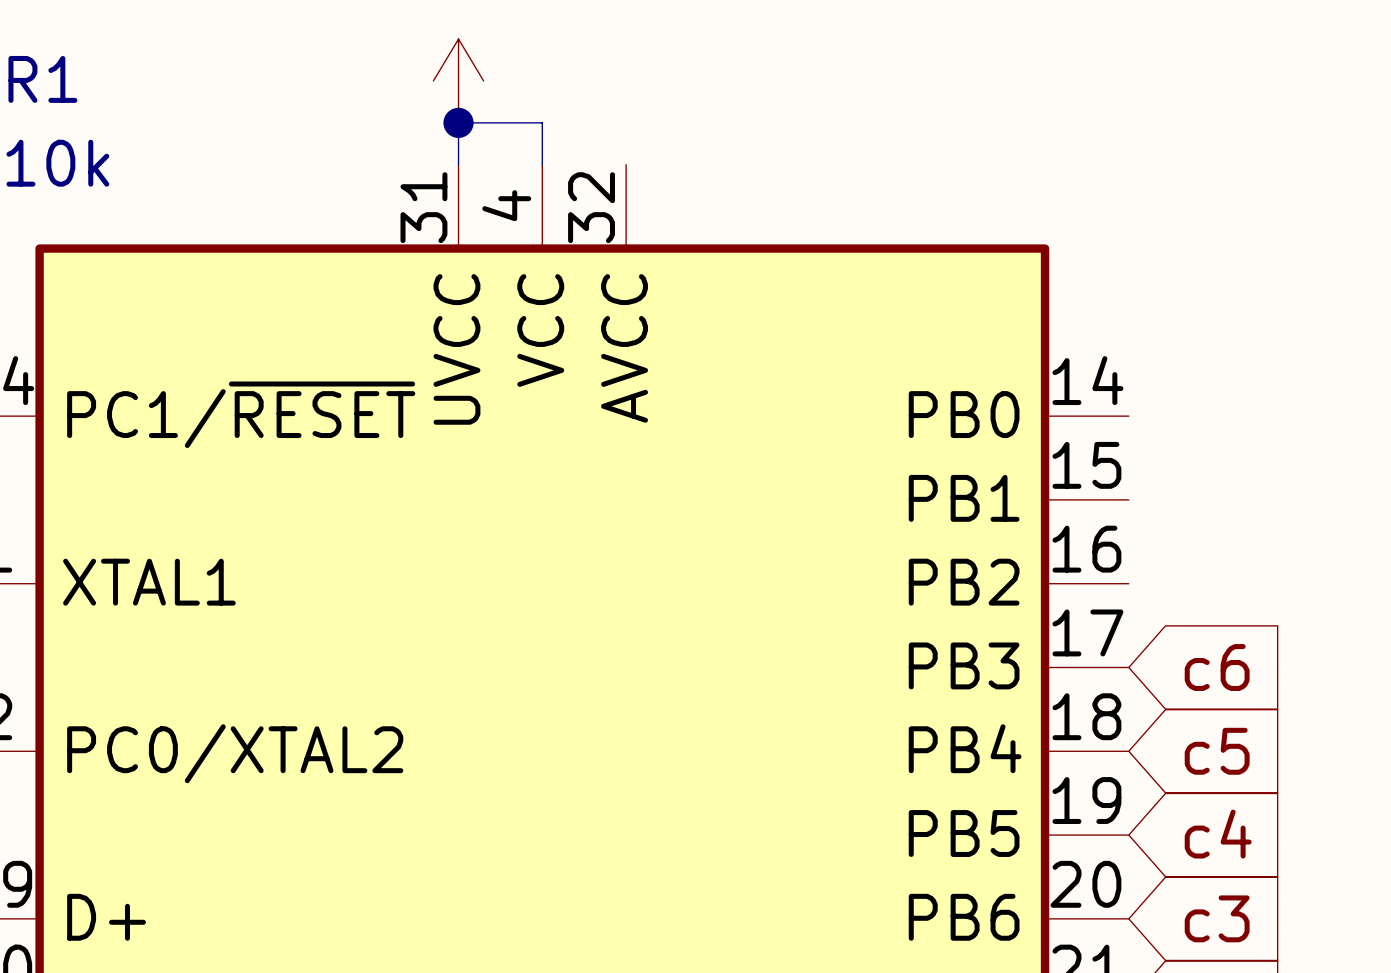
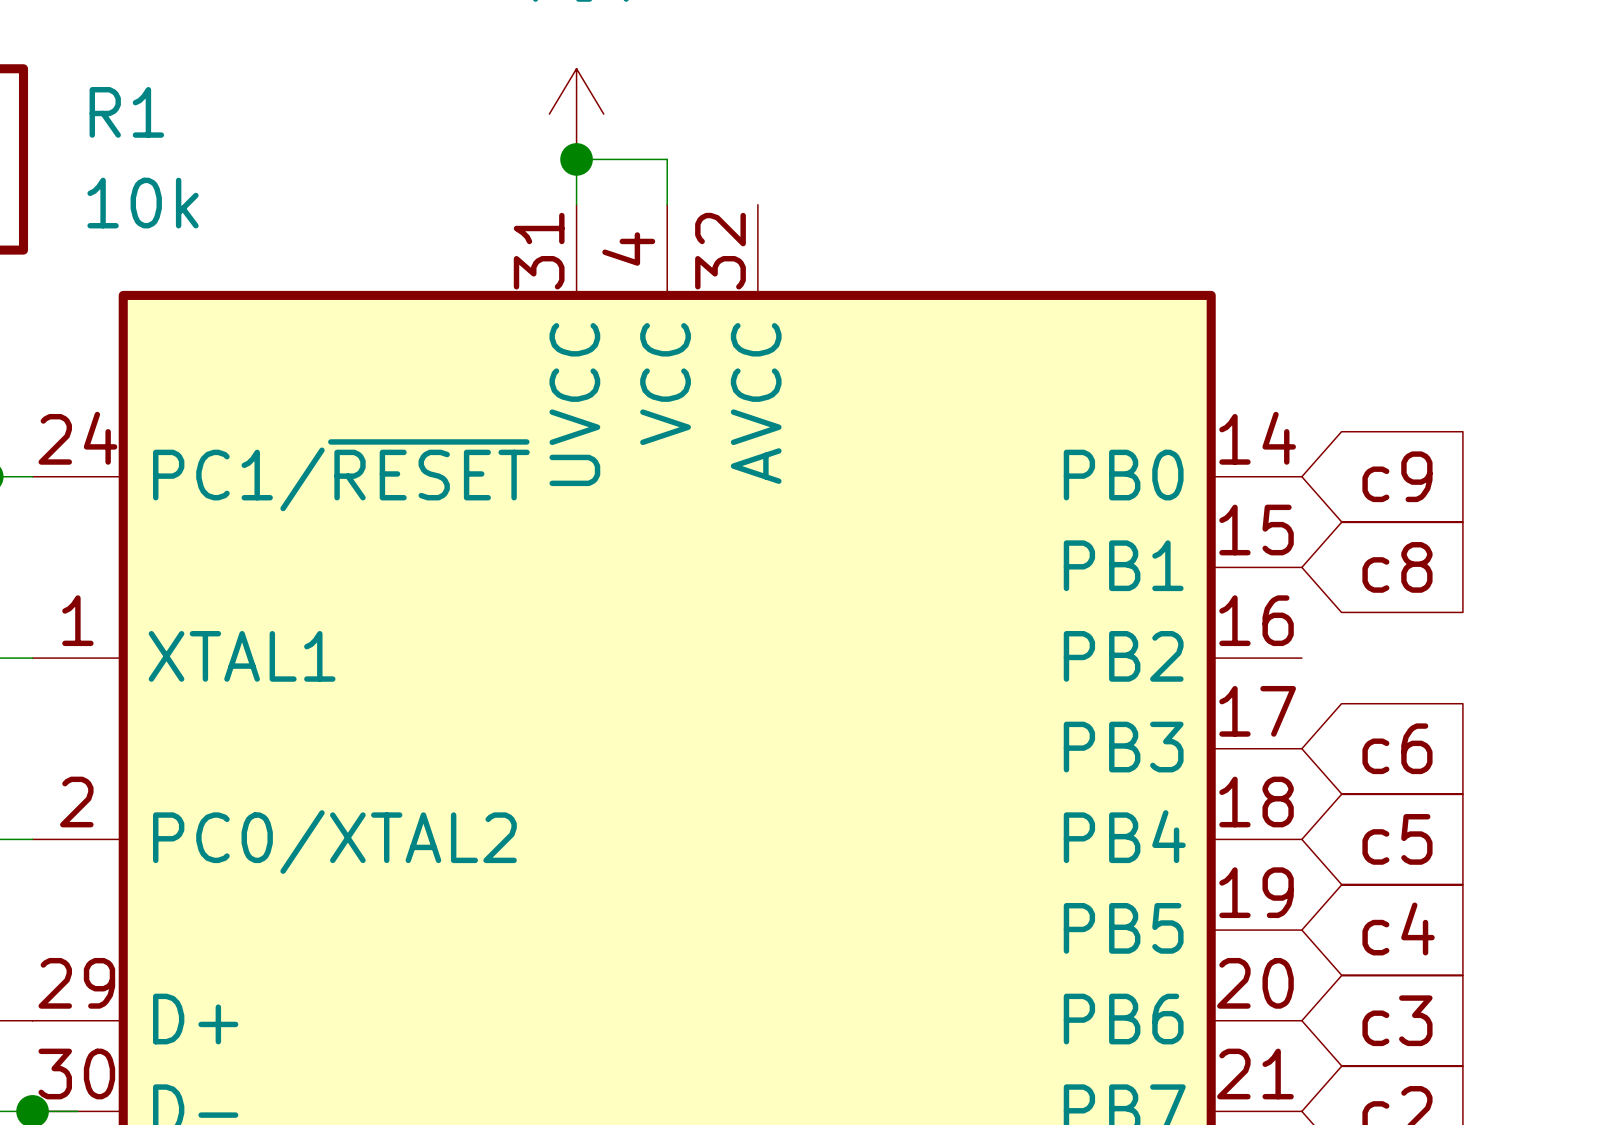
global label: none -> c9 (1397, 476)
global label: none -> c8 (1397, 567)

